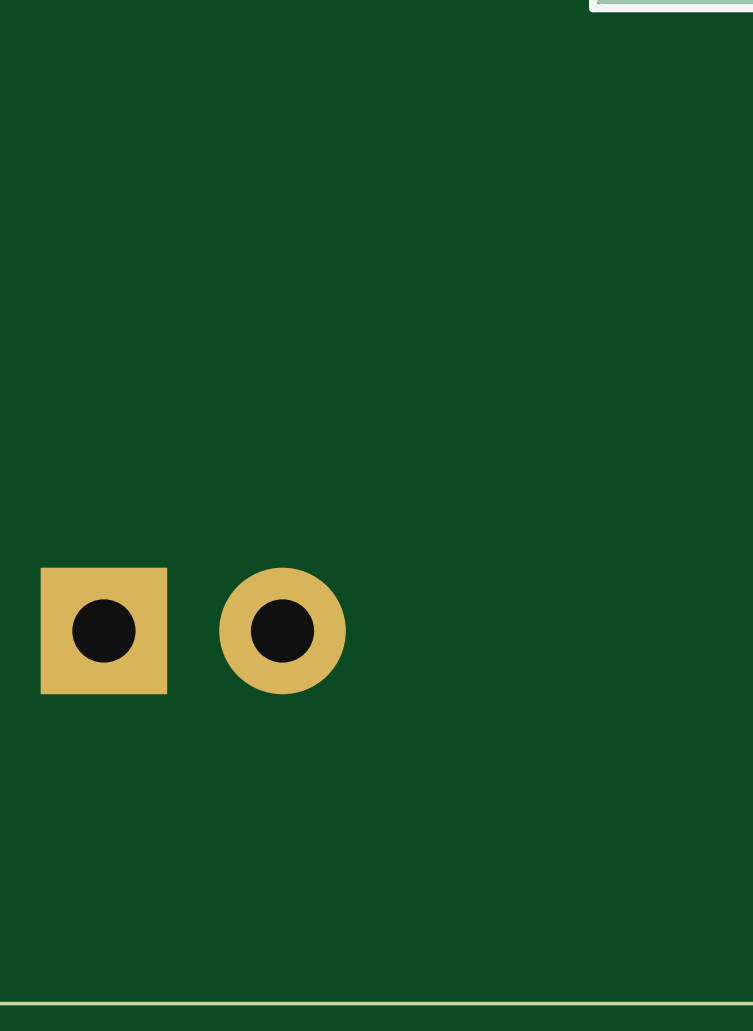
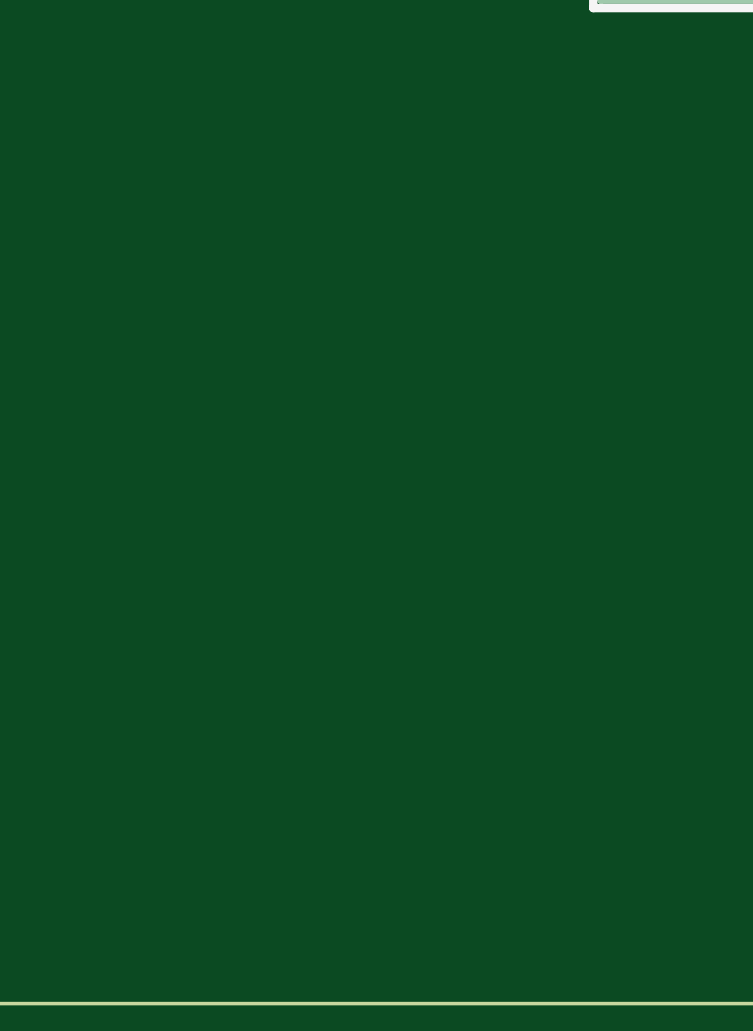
part: (193, 630) -> none

